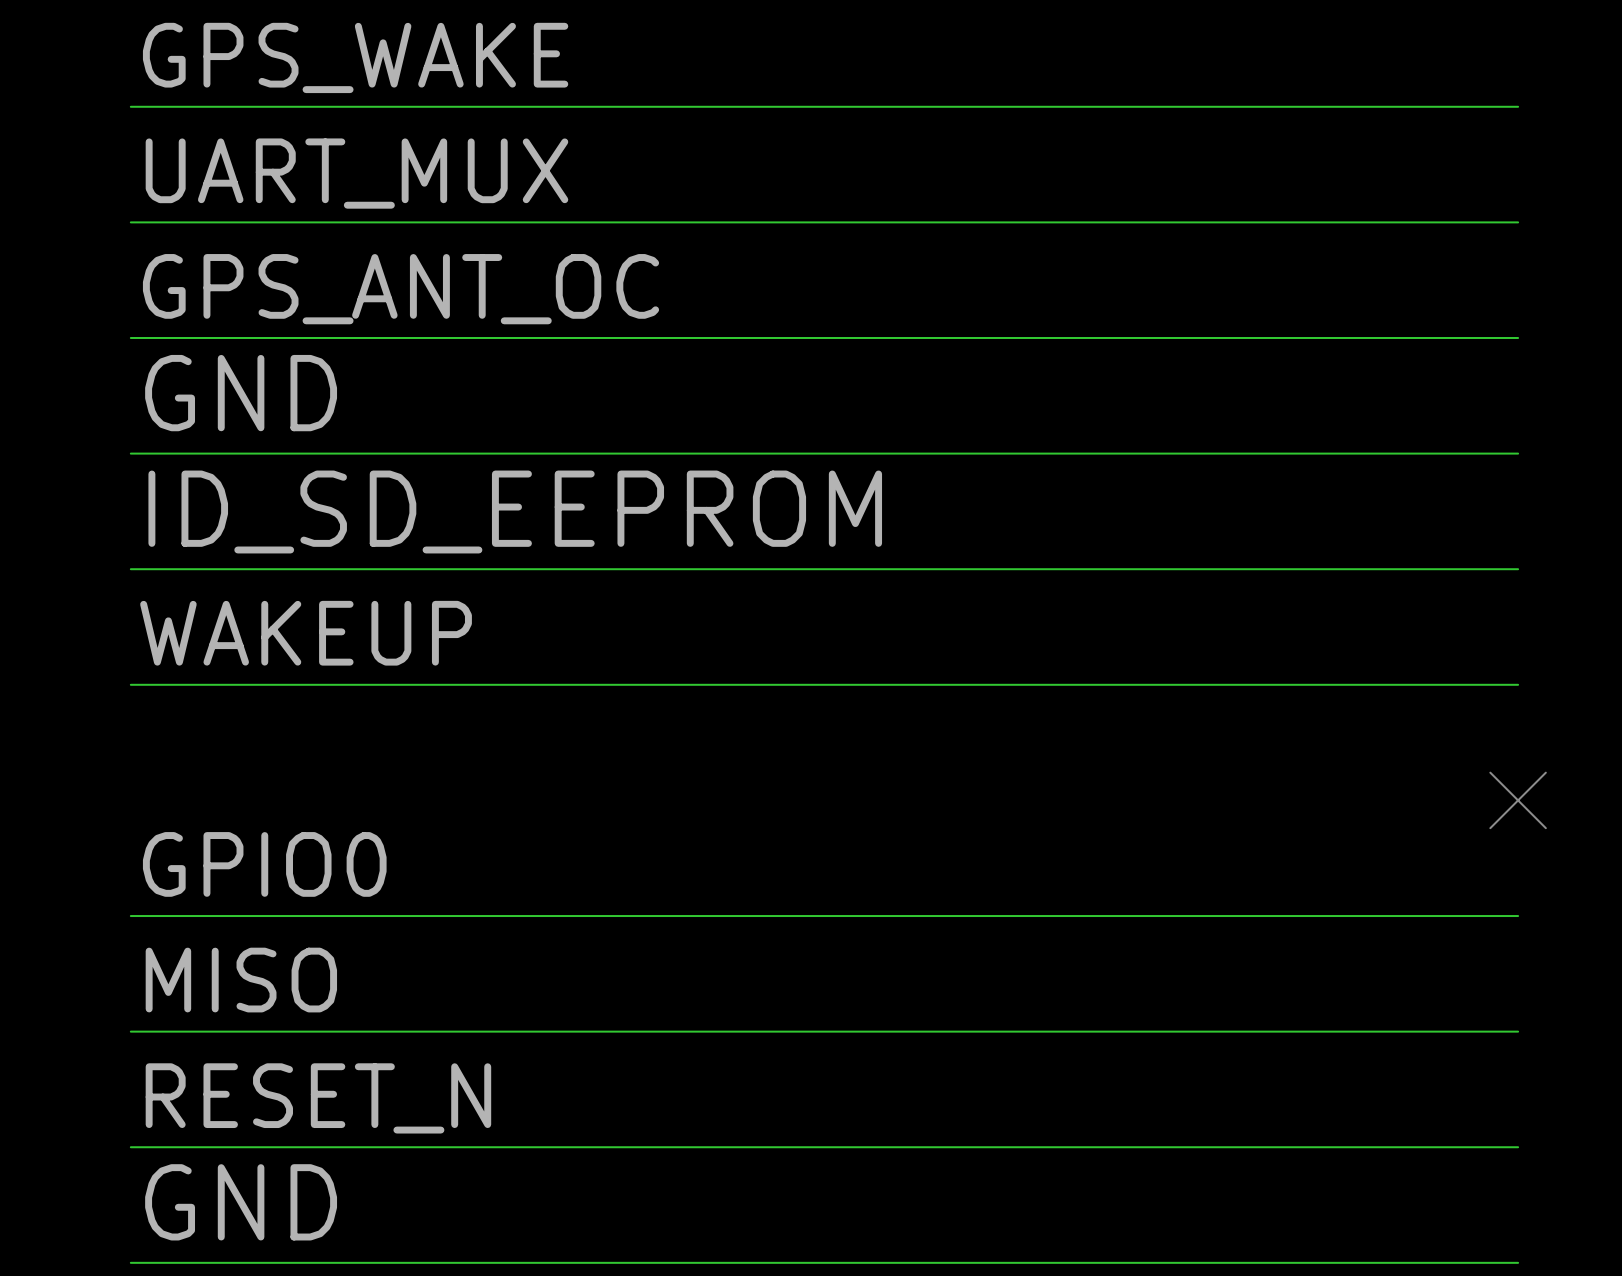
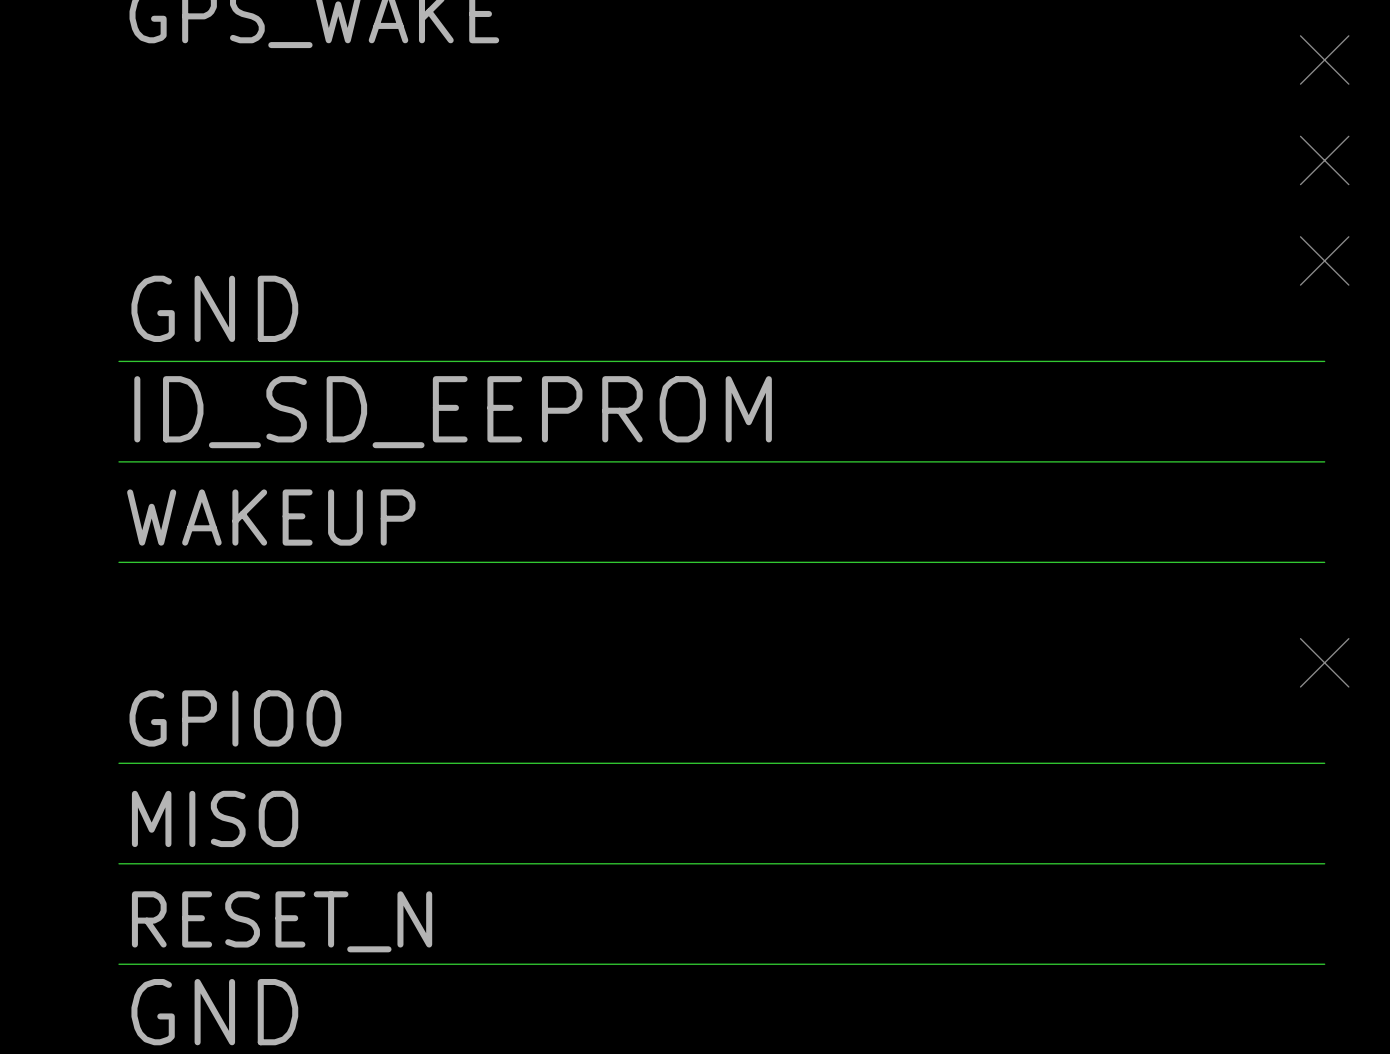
wire: (130, 106) (1518, 106) -> none
no-connect mark: none -> (1324, 59)
label: UART_MUX (356, 173) -> none
wire: (130, 222) (1518, 222) -> none
no-connect mark: none -> (1324, 160)
label: GPS_ANT_OC (401, 289) -> none
wire: (130, 337) (1518, 337) -> none
no-connect mark: none -> (1324, 260)

